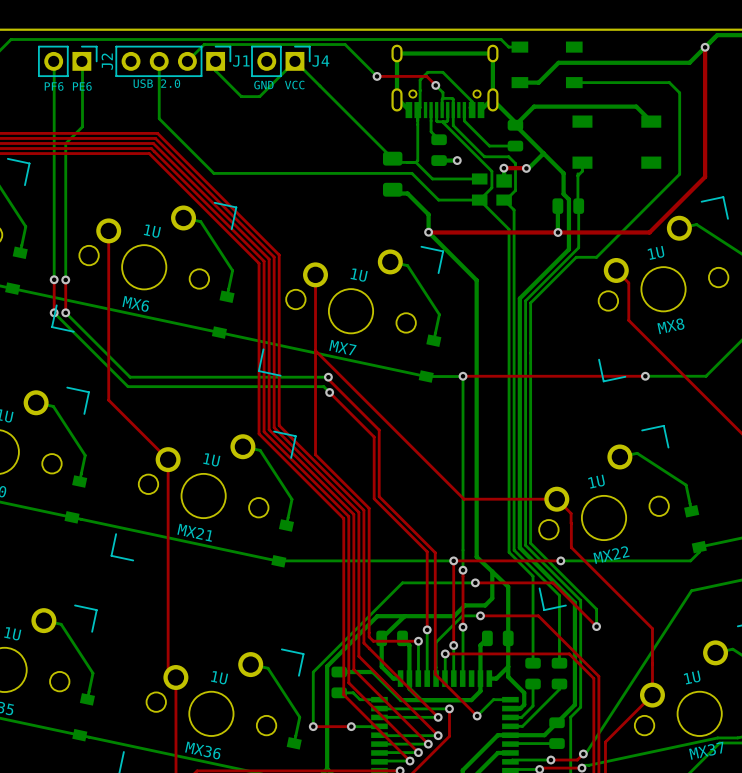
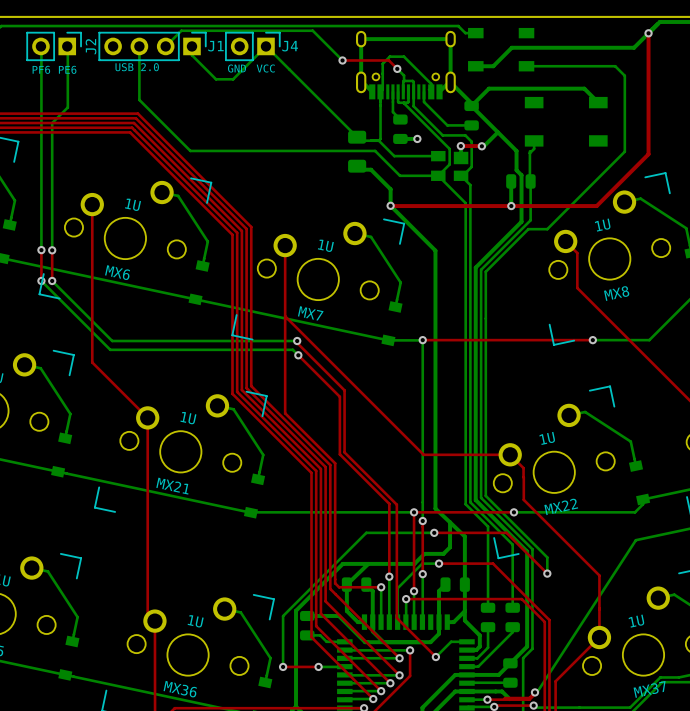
bottom track: (717, 737) (584, 765) (581, 768) -> (660, 677) (630, 707) (537, 707)
bottom track: none -> (466, 691) (502, 691) (509, 699)
top track: none -> (534, 694) (529, 699) (487, 699) (489, 698)
bottom track: (550, 760) (512, 760) (510, 761) -> (487, 699) (467, 699)
via: (550, 760) -> none
via: none -> (487, 699)

